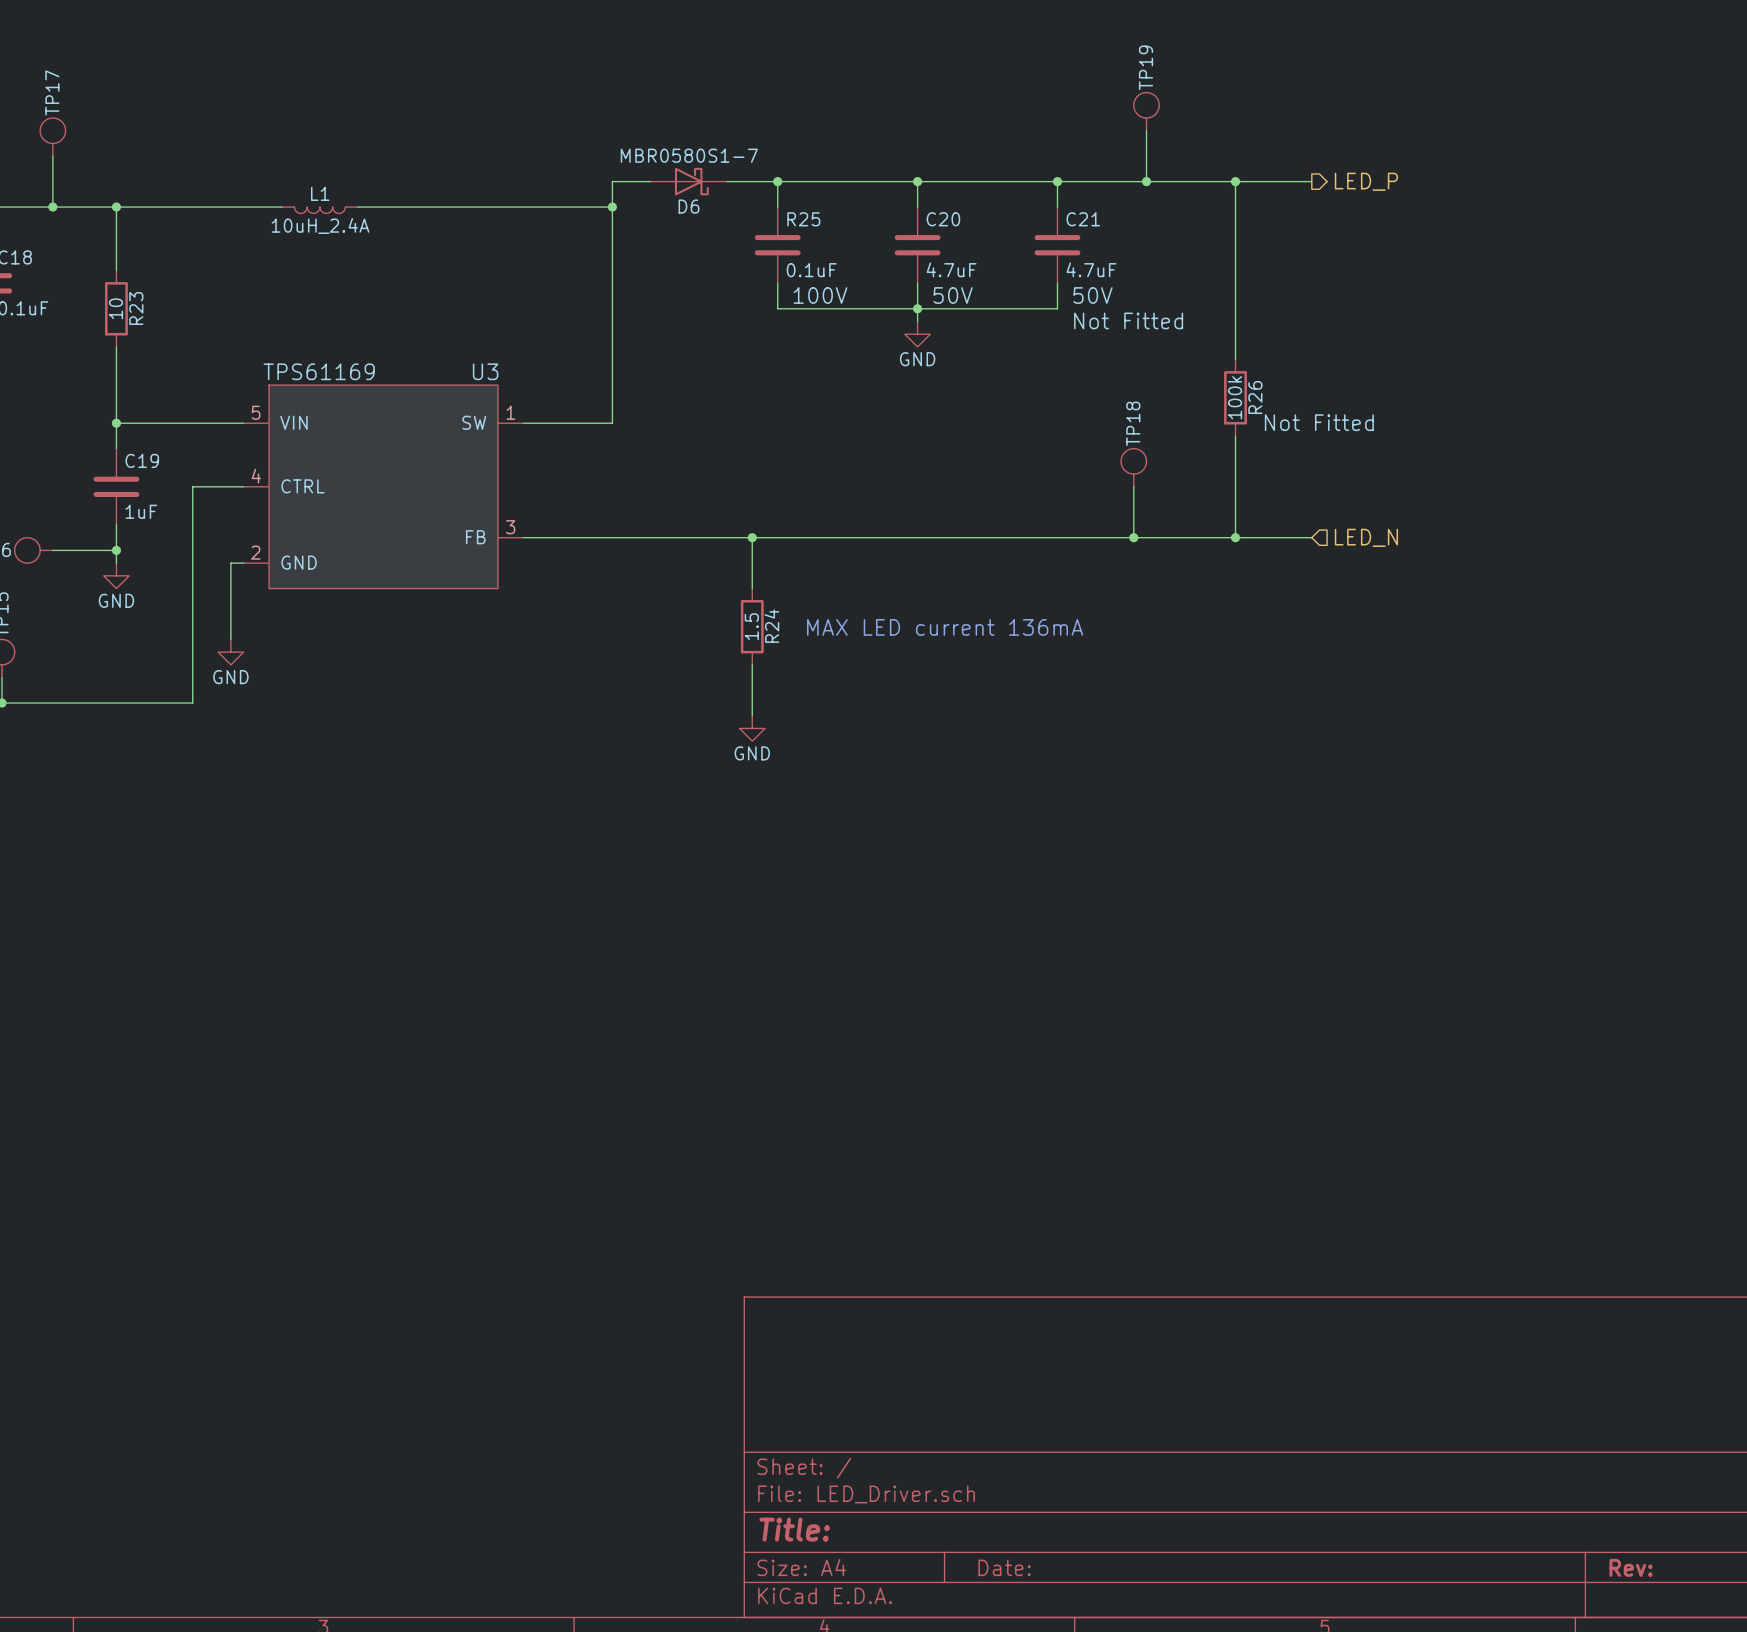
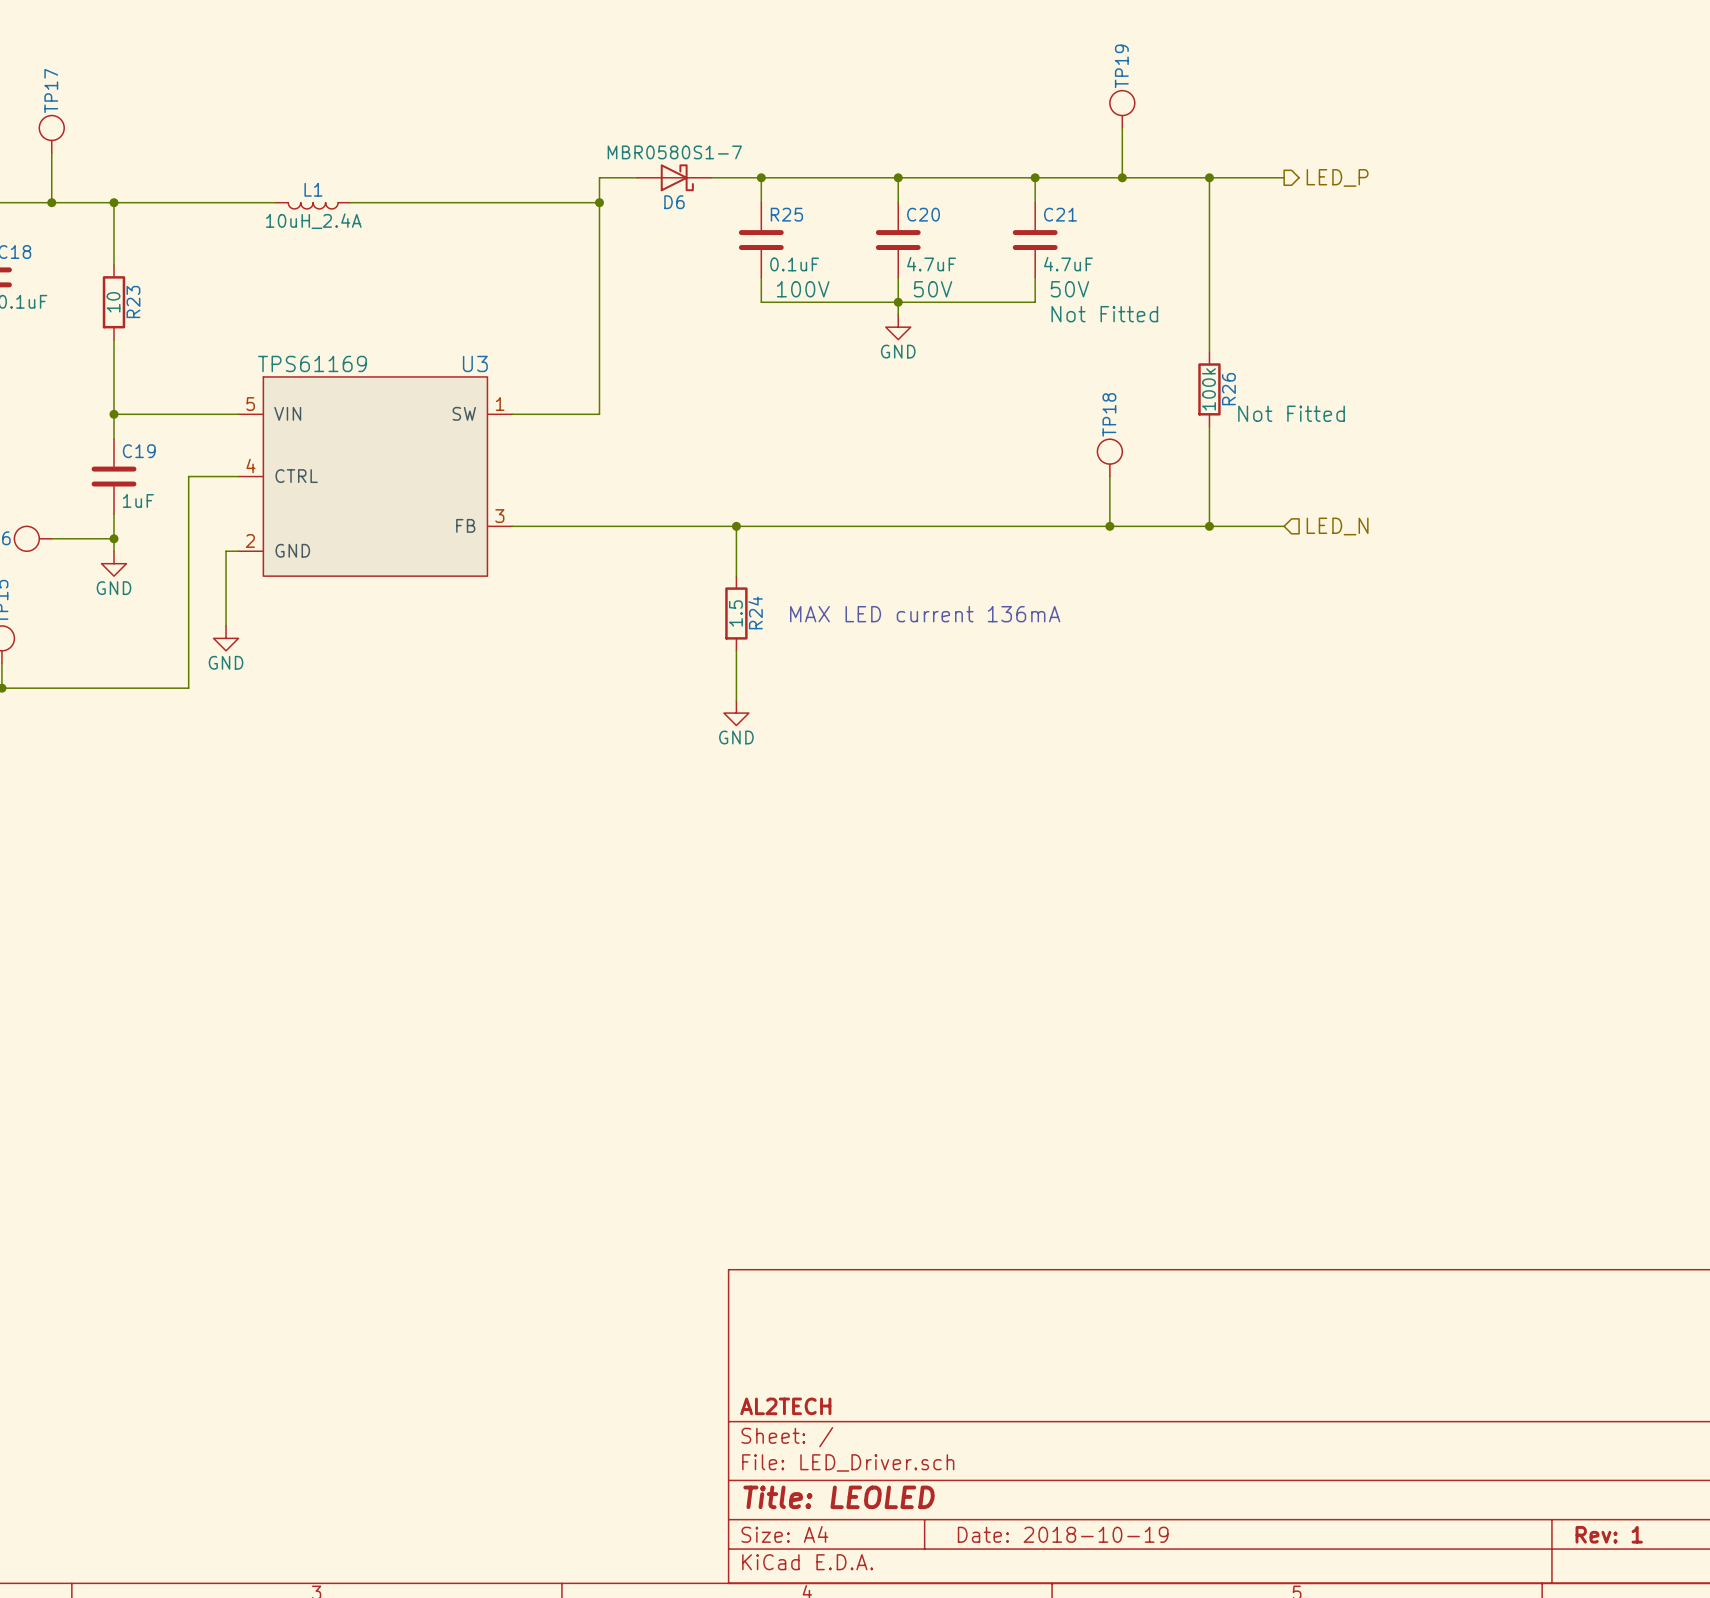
title block: none -> AL2TECH (785, 1406)
title block: Title: (794, 1529) -> Title: LEOLED (839, 1497)
title block: Date: (1004, 1567) -> Date: 2018-10-19 (1063, 1534)
title block: Rev: (1631, 1567) -> Rev: 1 (1609, 1534)

